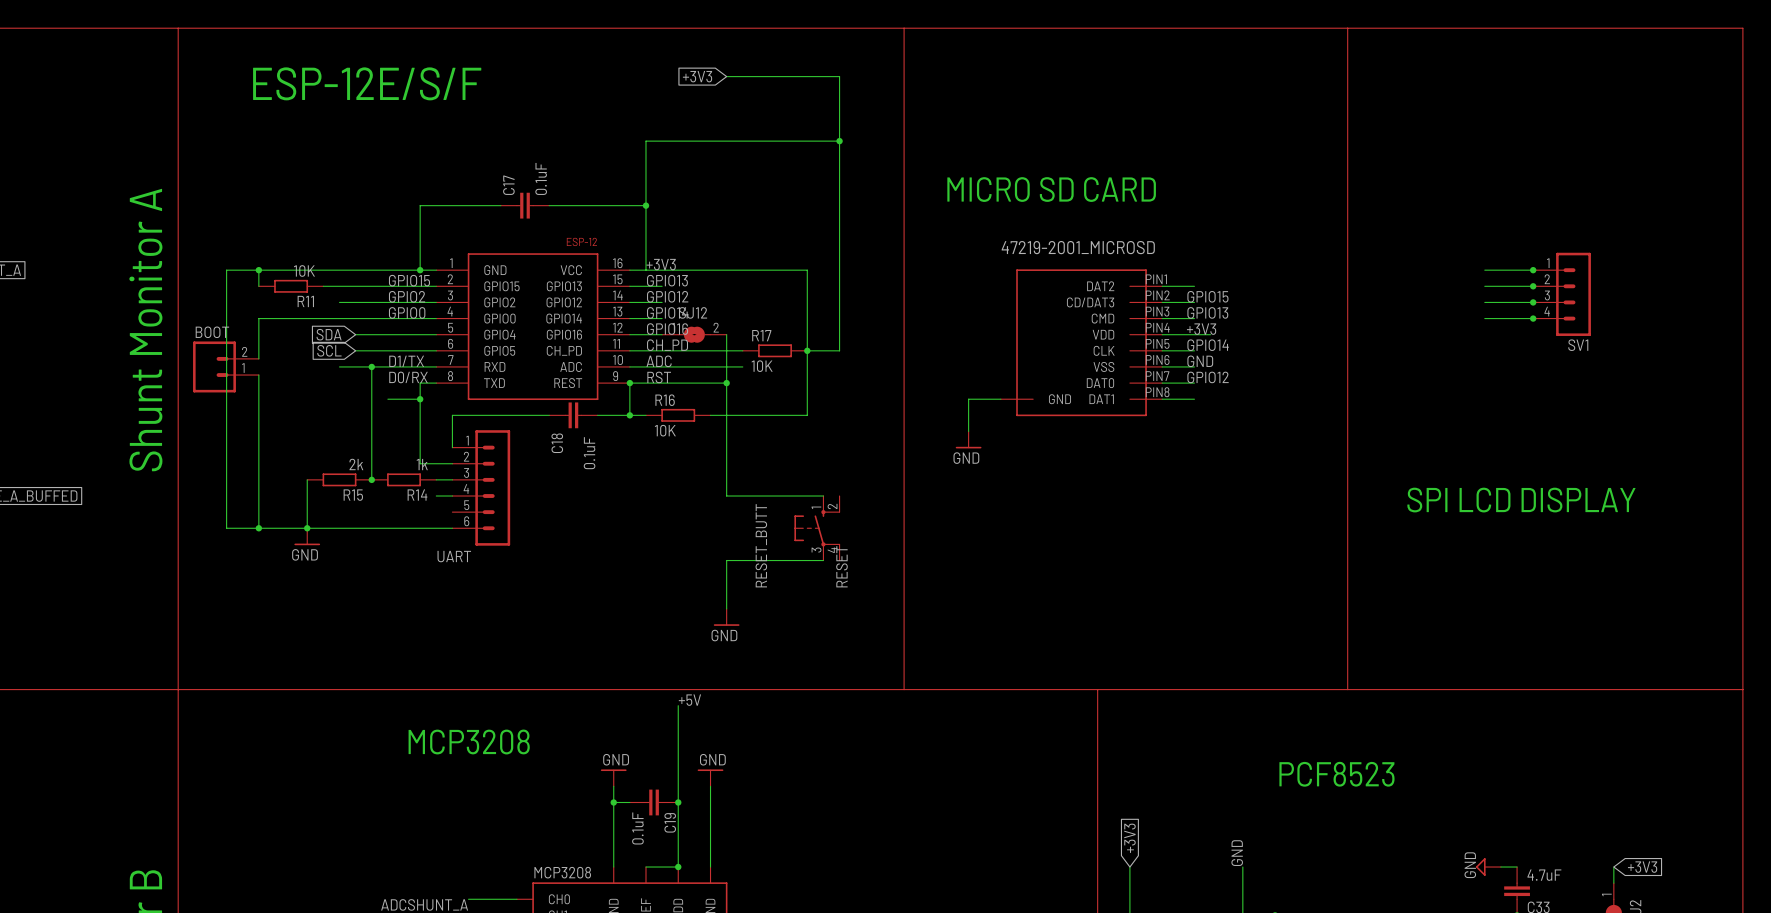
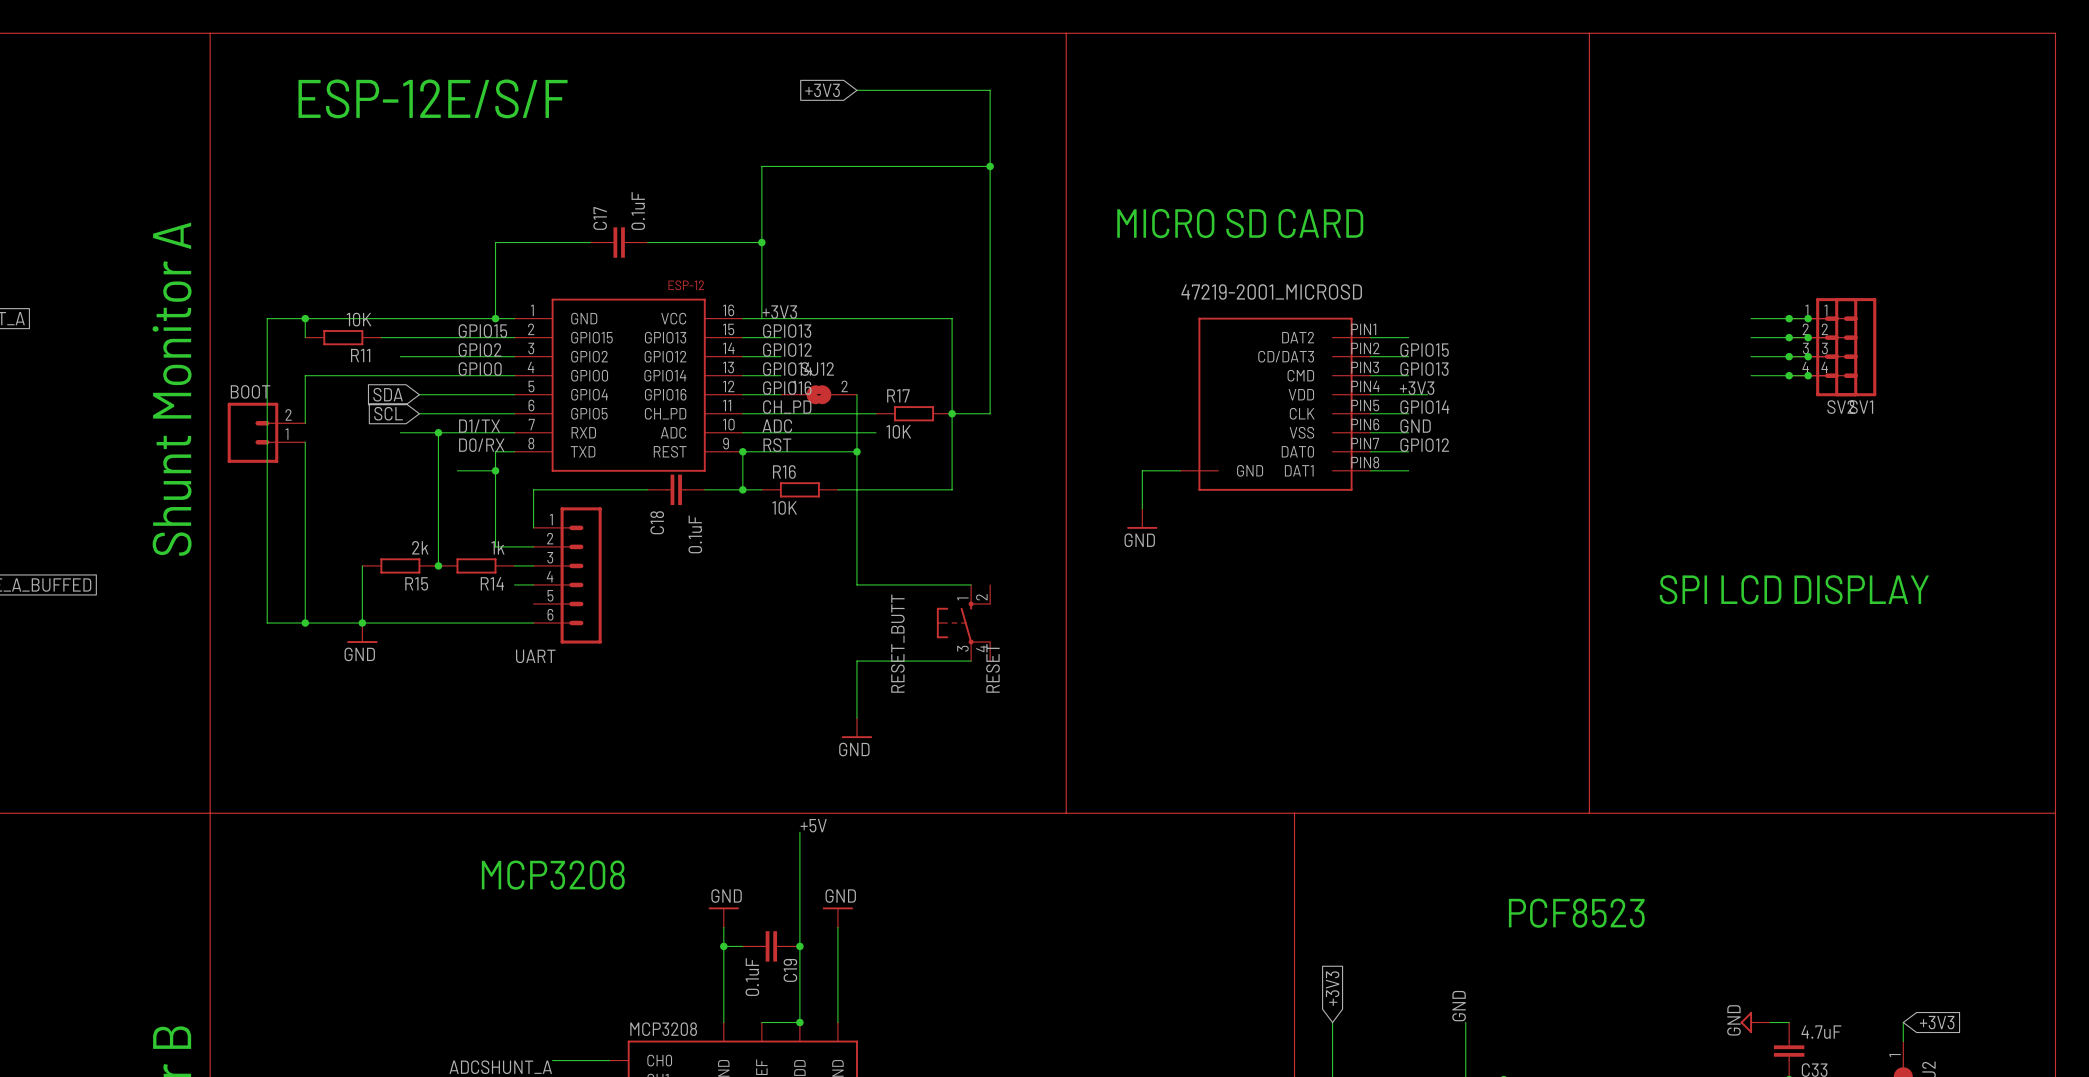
junction: none -> (1789, 318)
junction: none -> (1789, 337)
SV2: none -> (1823, 347)
junction: none -> (1789, 356)
junction: none -> (1789, 375)

